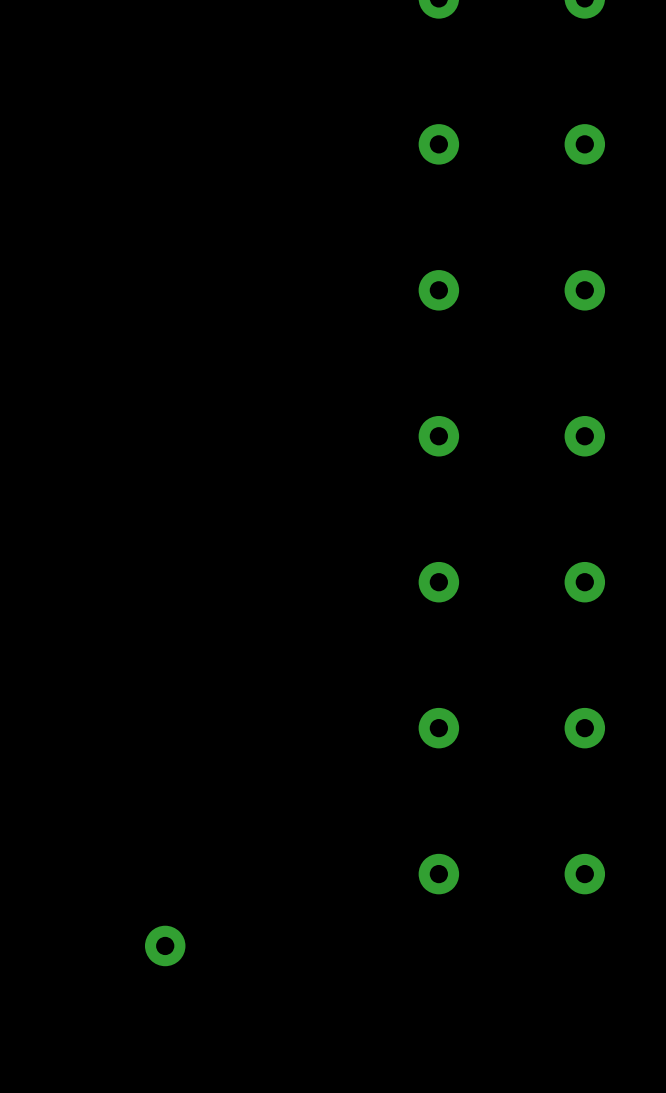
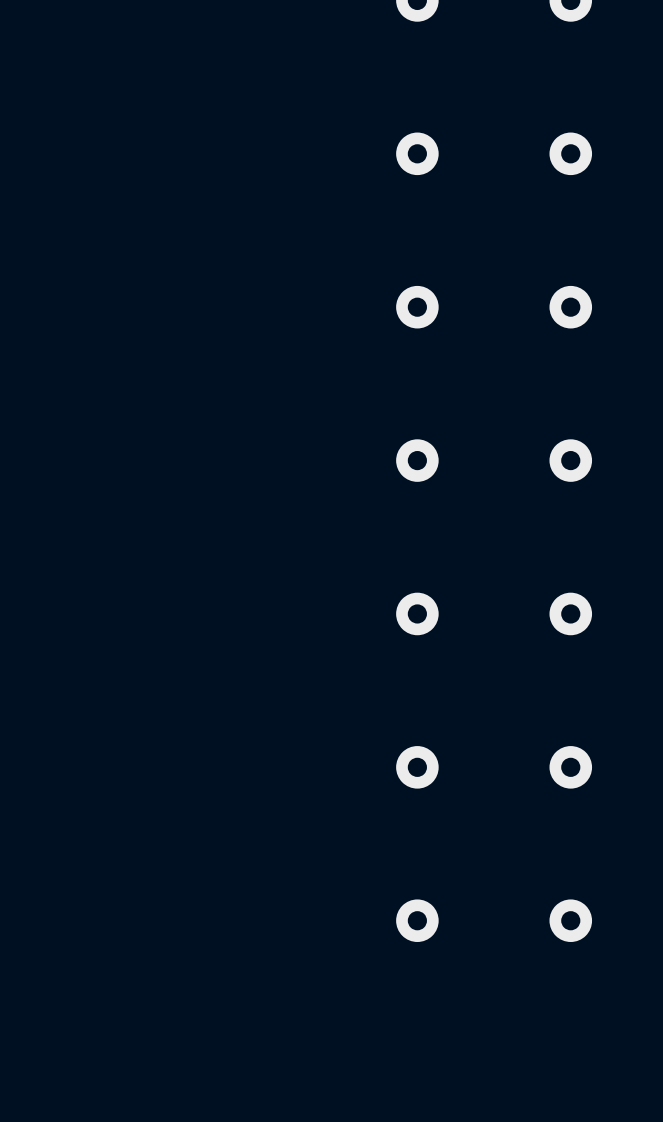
via: (165, 945) -> none

